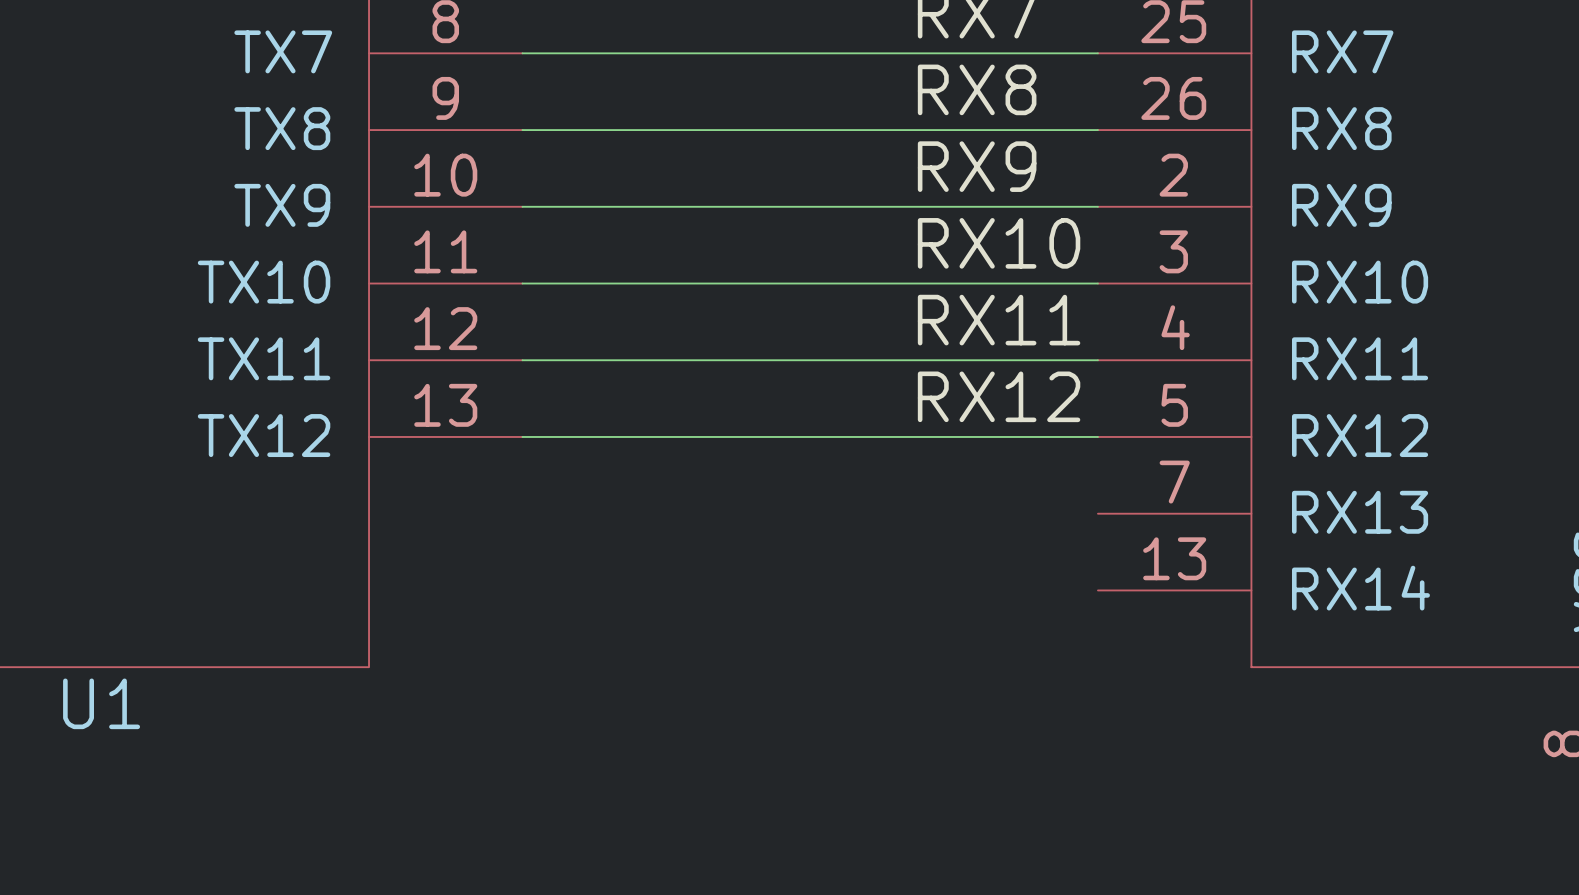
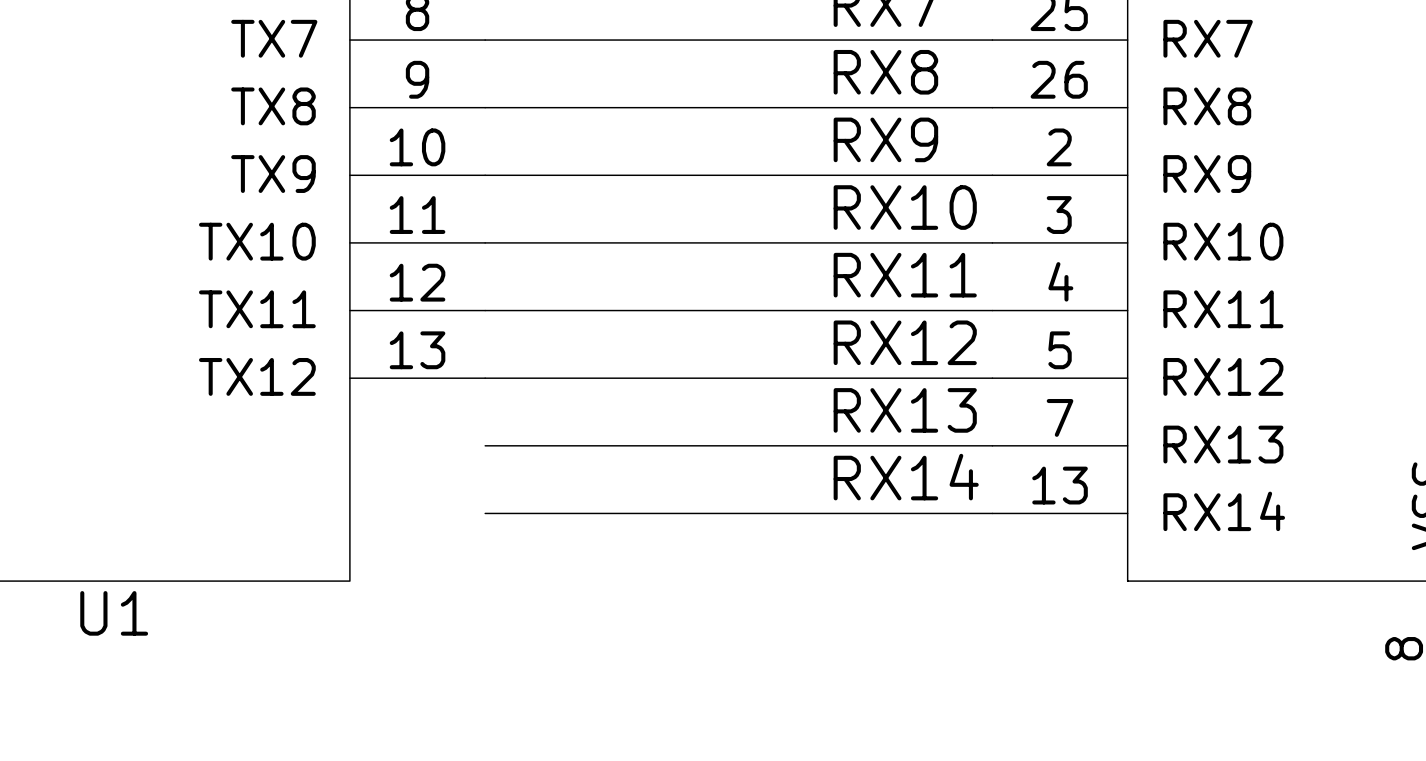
label: none -> RX13 (905, 410)
wire: none -> (485, 445) (992, 445)
label: none -> RX14 (906, 477)
wire: none -> (485, 513) (992, 513)

